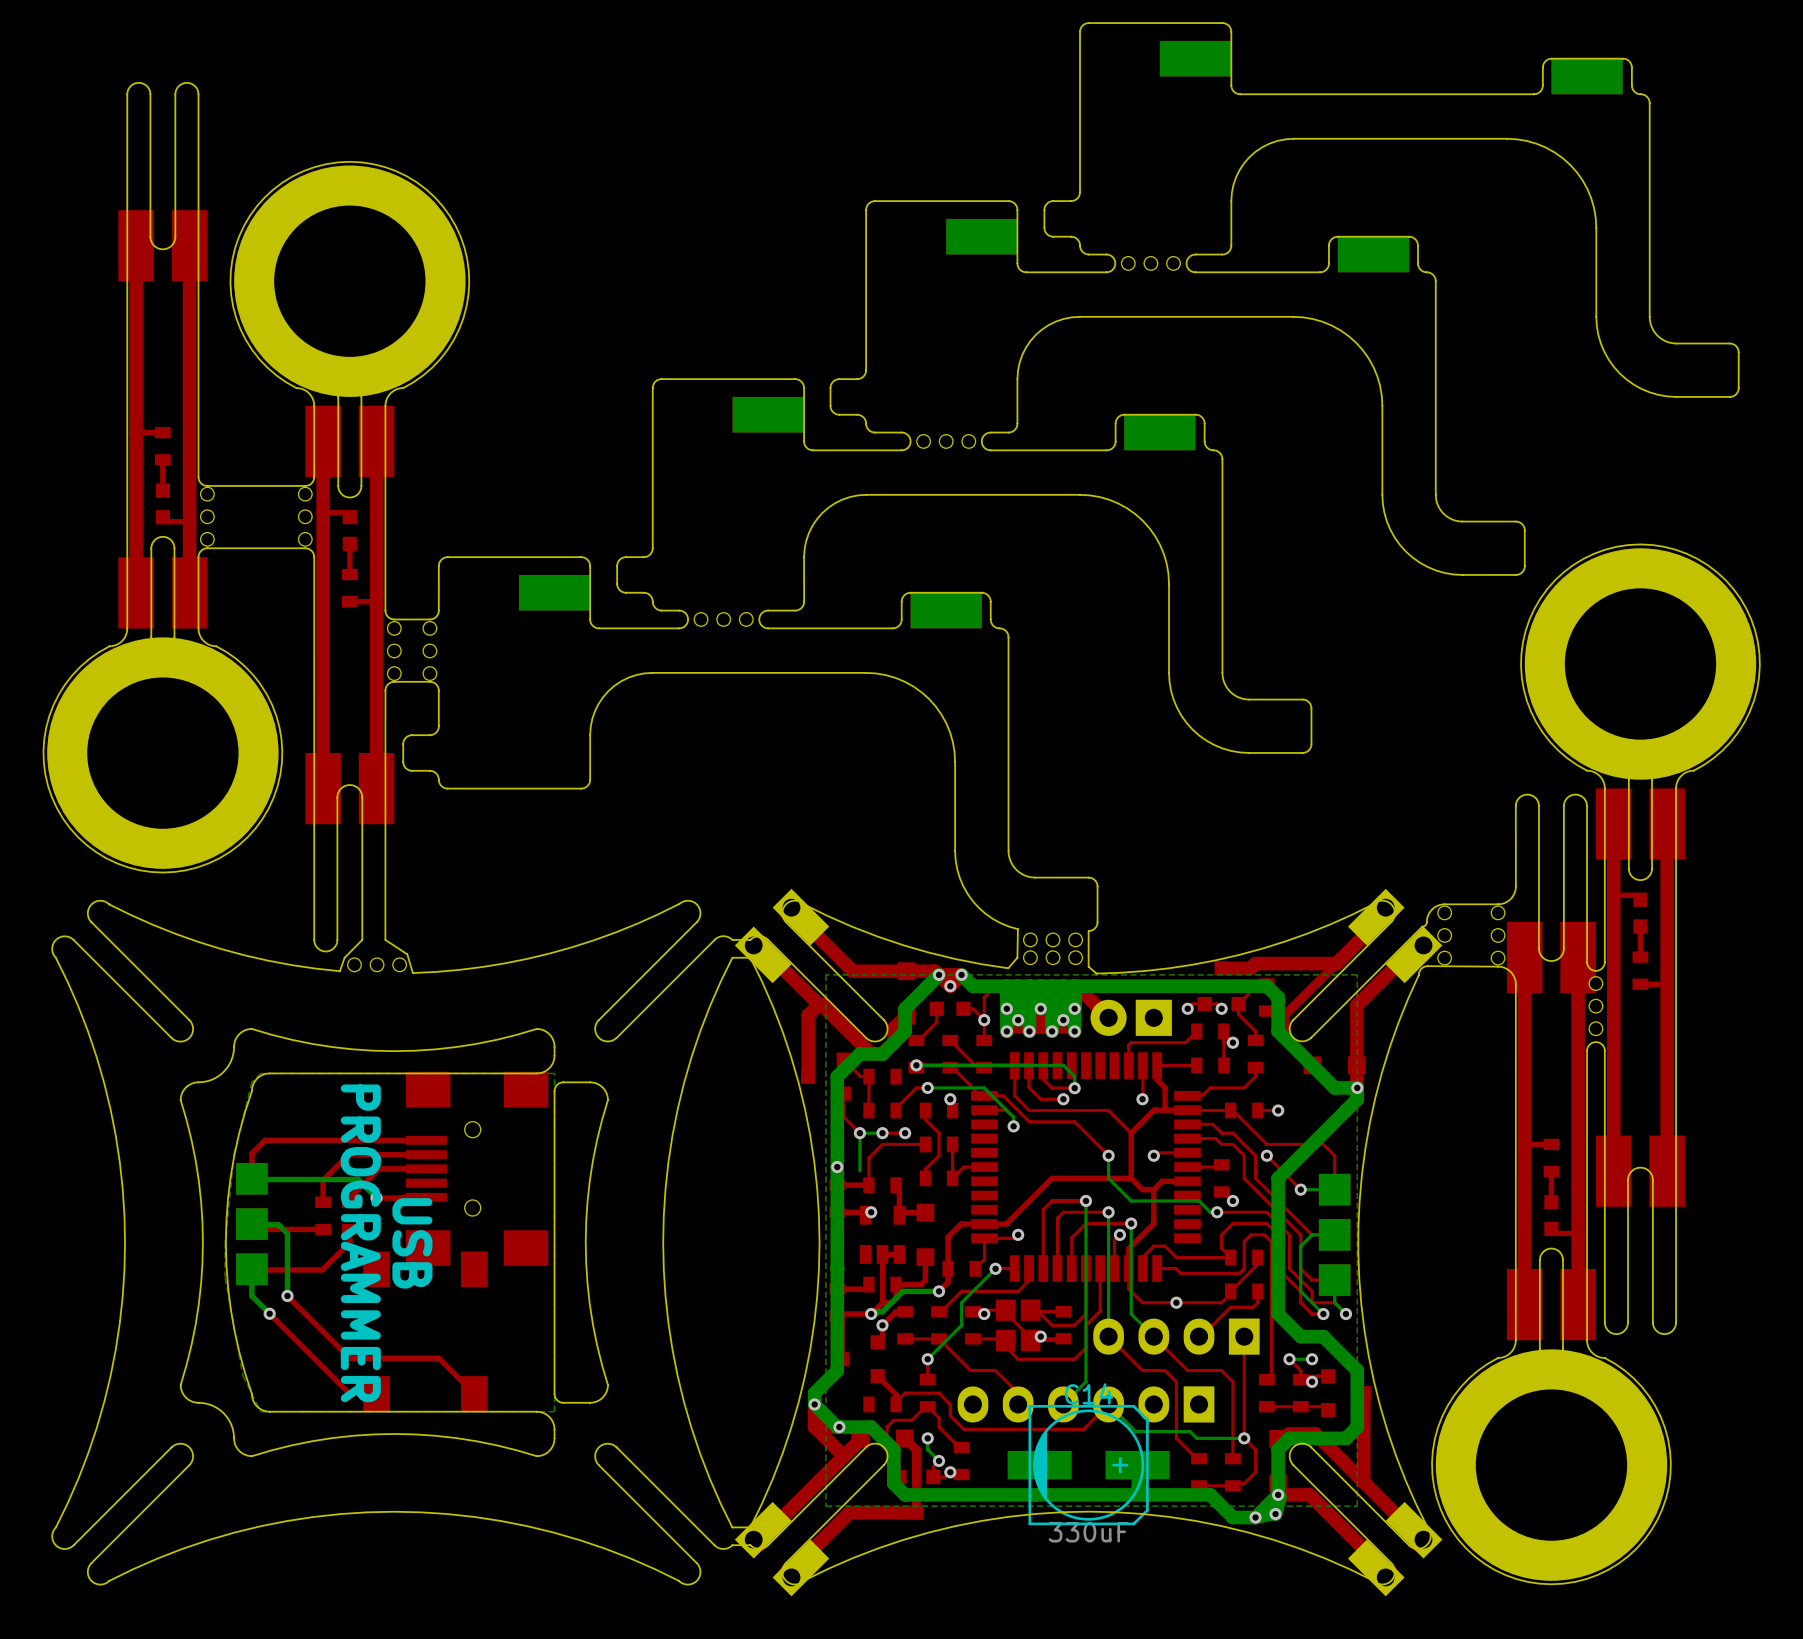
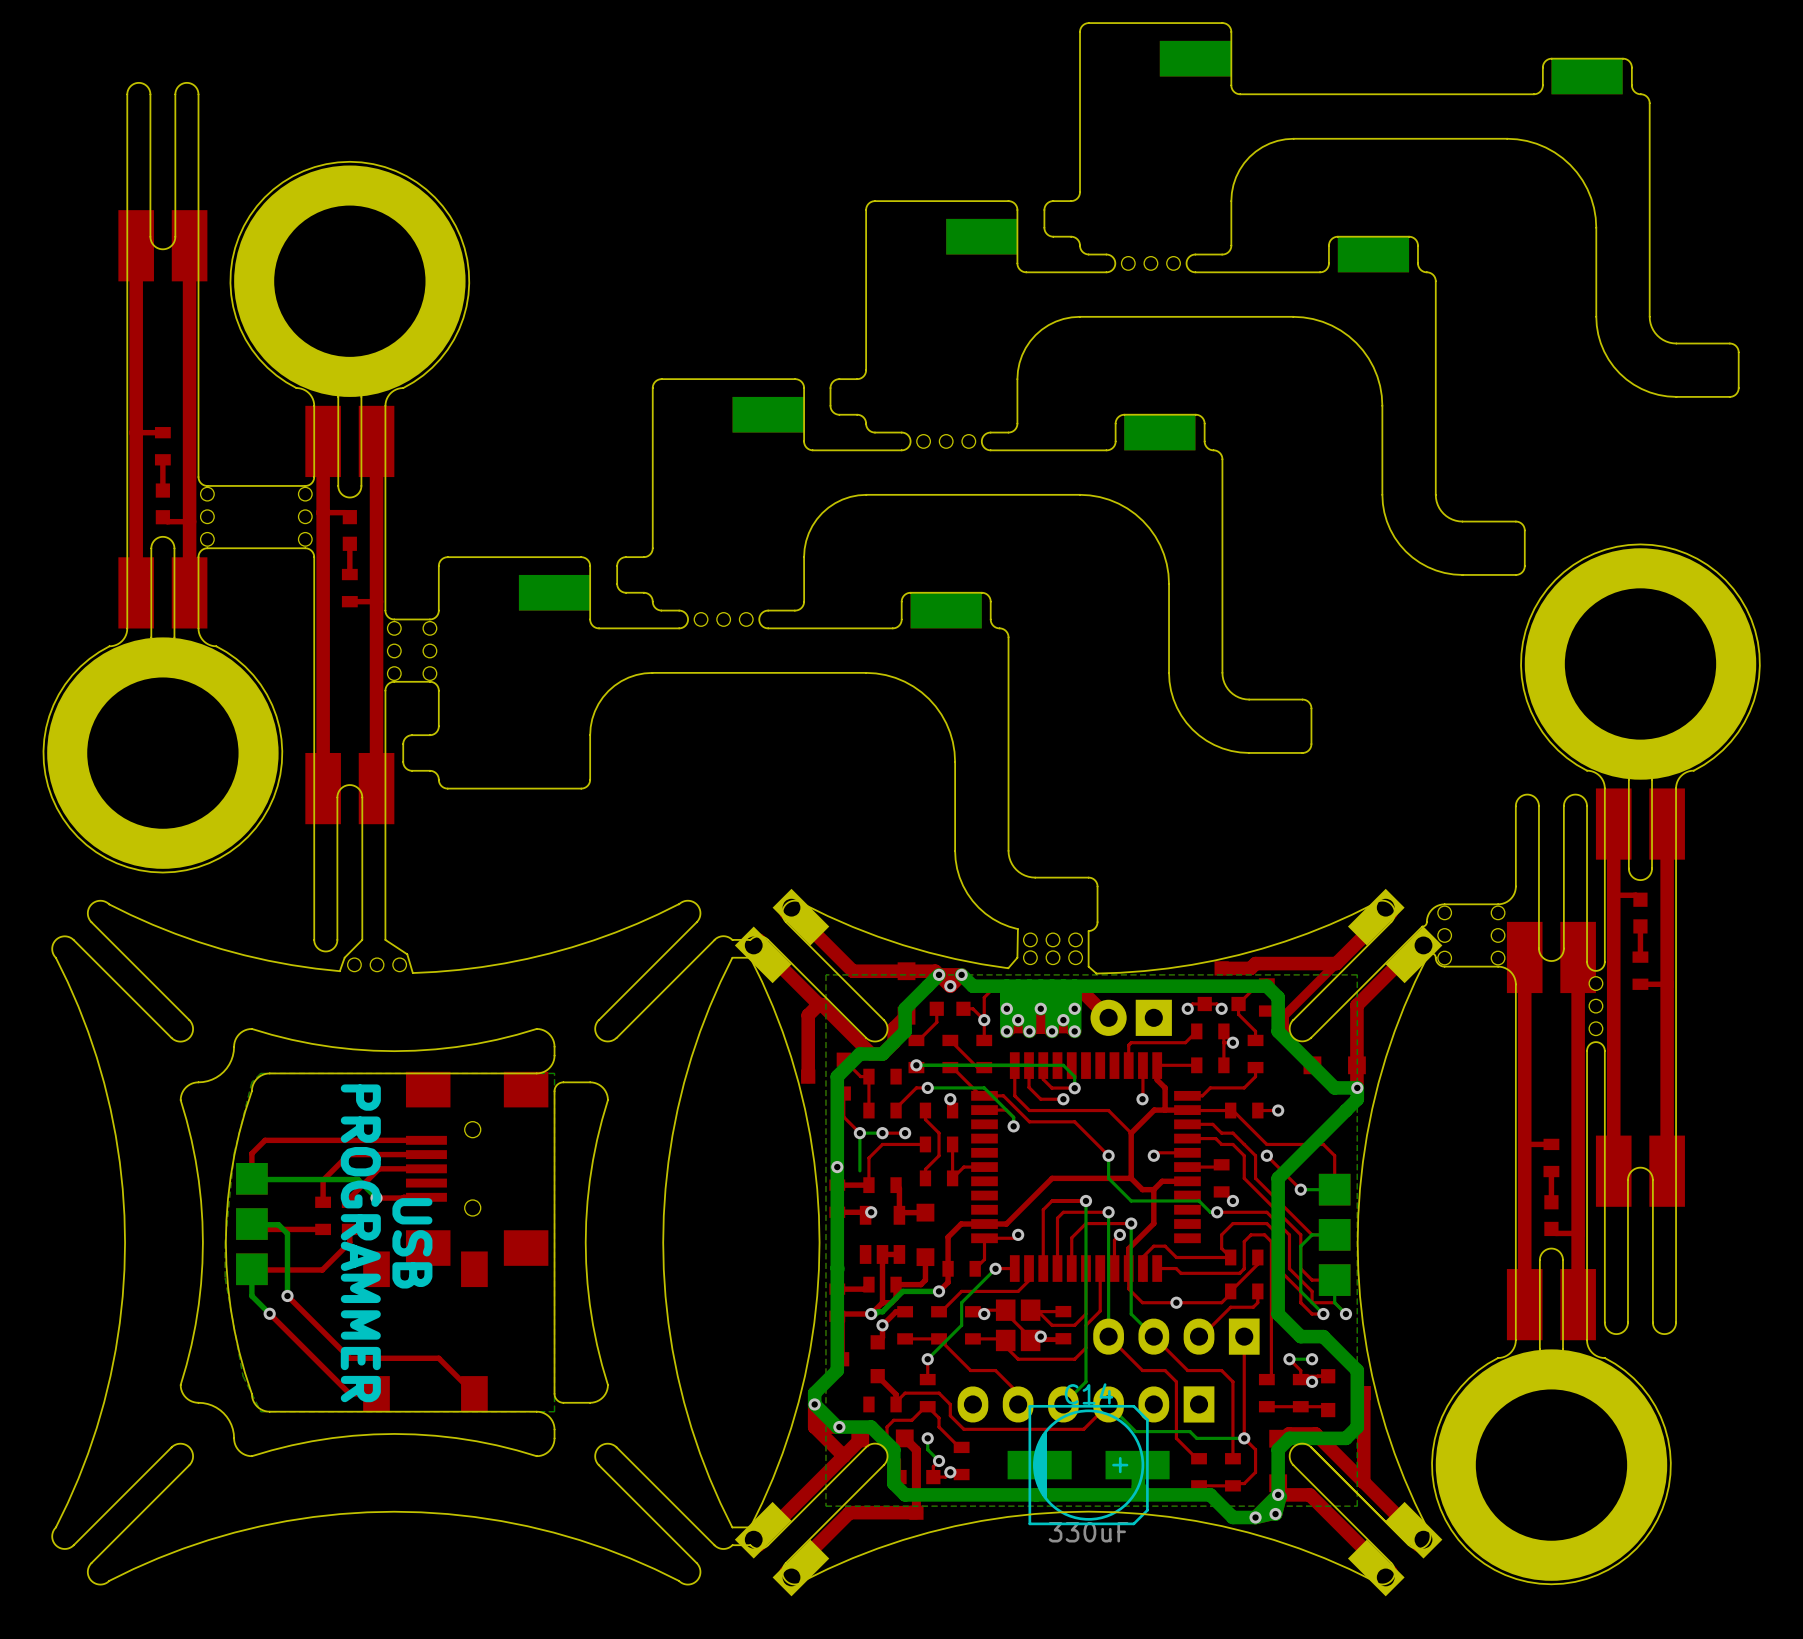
board edge: (1498, 966) (1427, 966) (1420, 969) (1389, 1047) (1375, 1097) (1365, 1148) (1359, 1200) (1358, 1252) (1361, 1304) (1368, 1355) (1380, 1406) (1396, 1455) (1430, 1534) (1428, 1542) (1422, 1547) (1416, 1548) (1408, 1545) -> (1498, 966) (1443, 966) (1437, 963) (1434, 954) (1427, 955) (1404, 1006) (1386, 1057) (1372, 1109) (1362, 1162) (1358, 1215) (1358, 1269) (1366, 1349) (1378, 1402) (1394, 1453) (1415, 1503) (1430, 1533) (1427, 1543) (1419, 1548) (1410, 1546) (1311, 1447)

